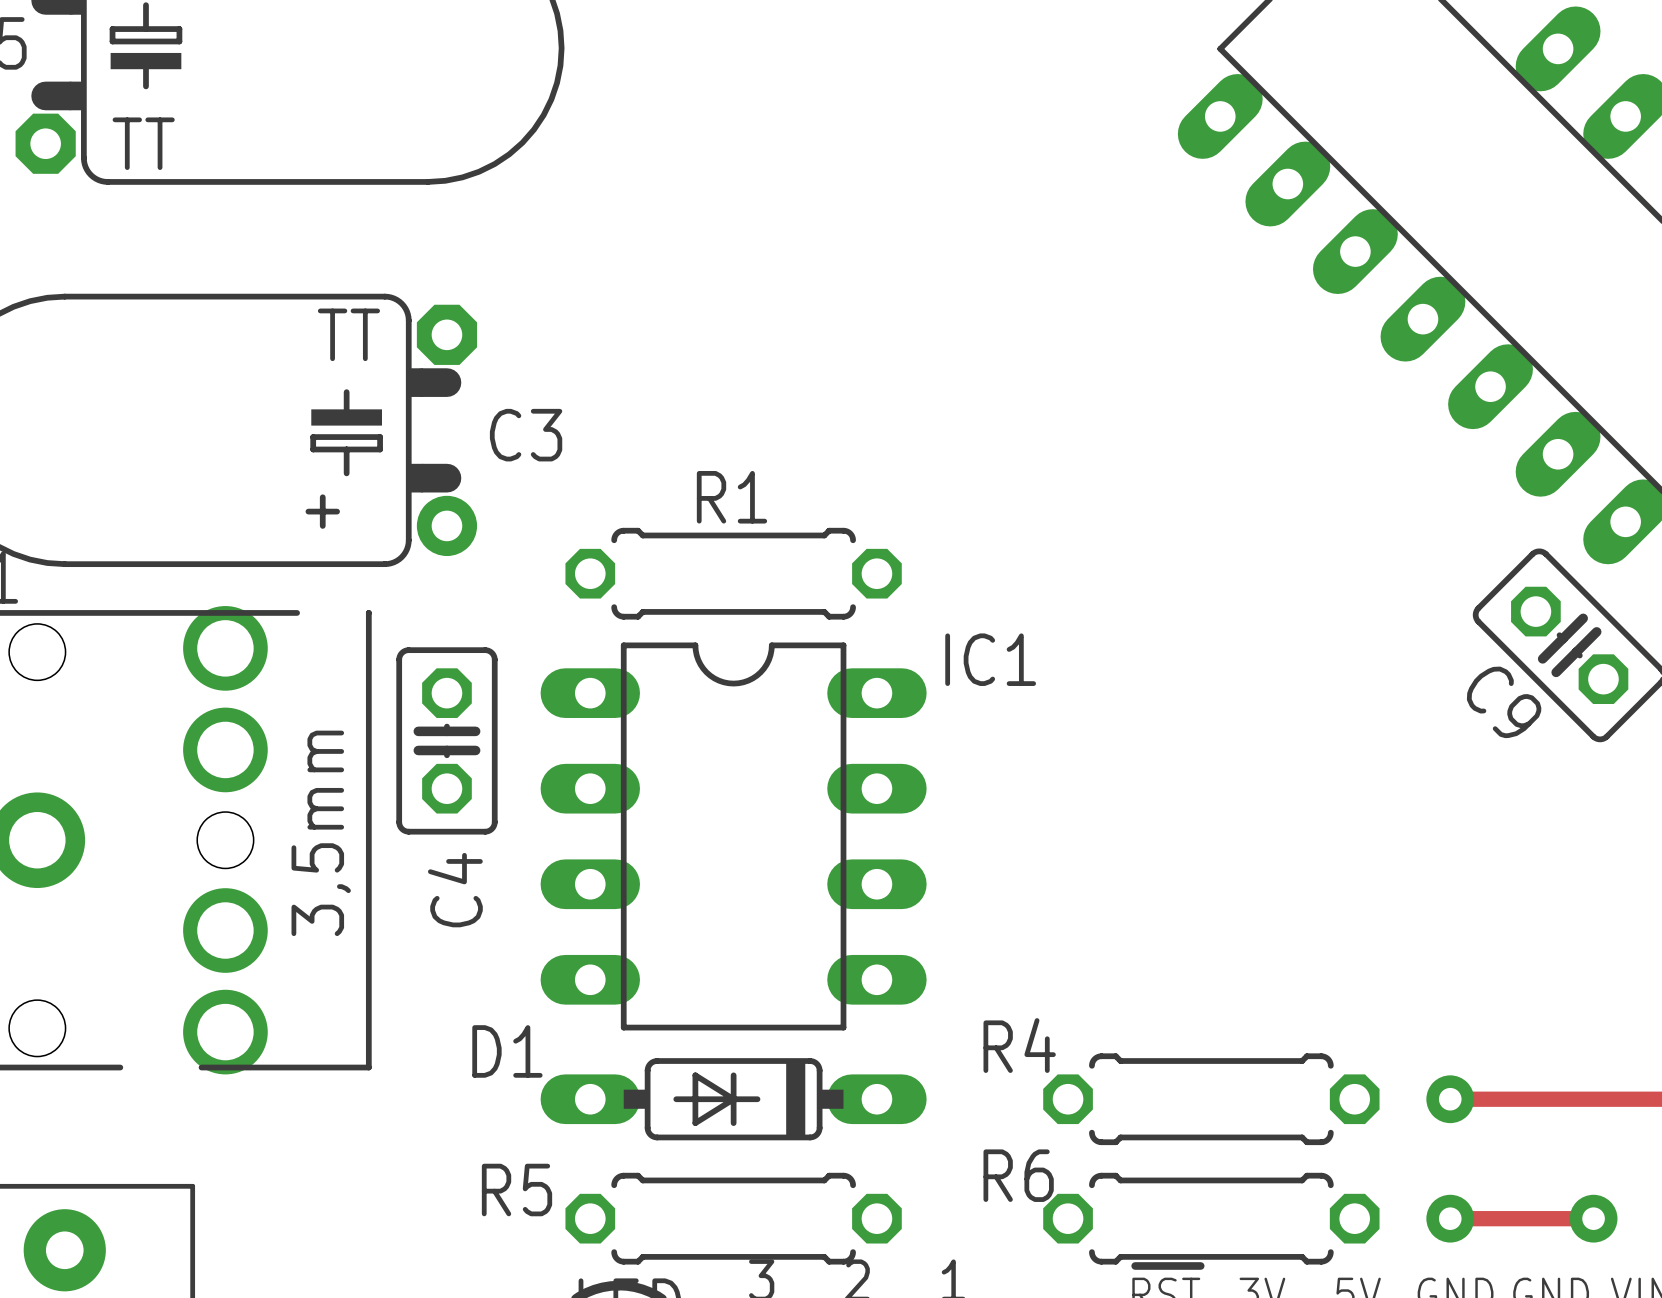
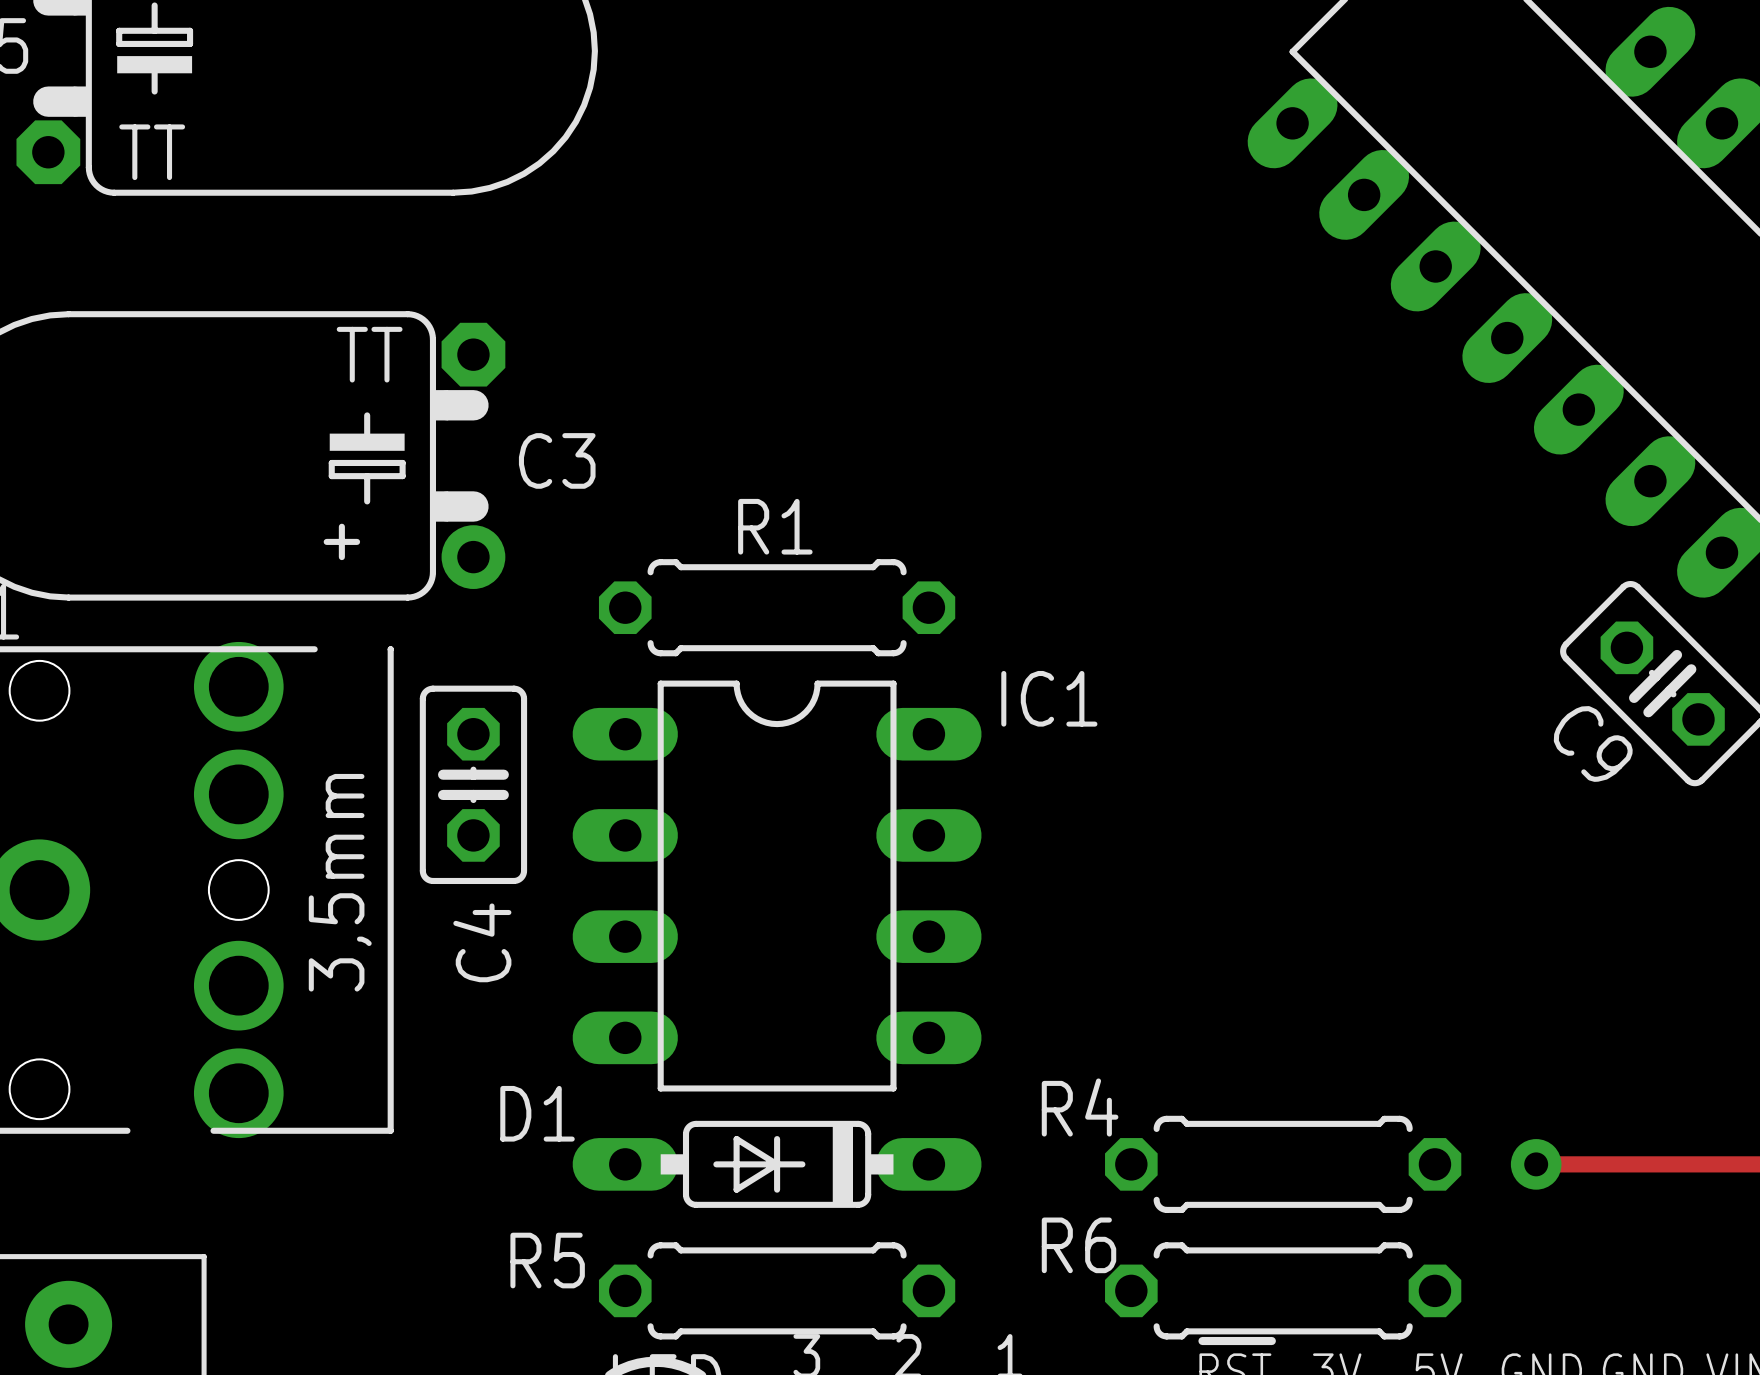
track: (1450, 1218) (1593, 1218) -> none
via: (1450, 1218) -> none
via: (1593, 1218) -> none

